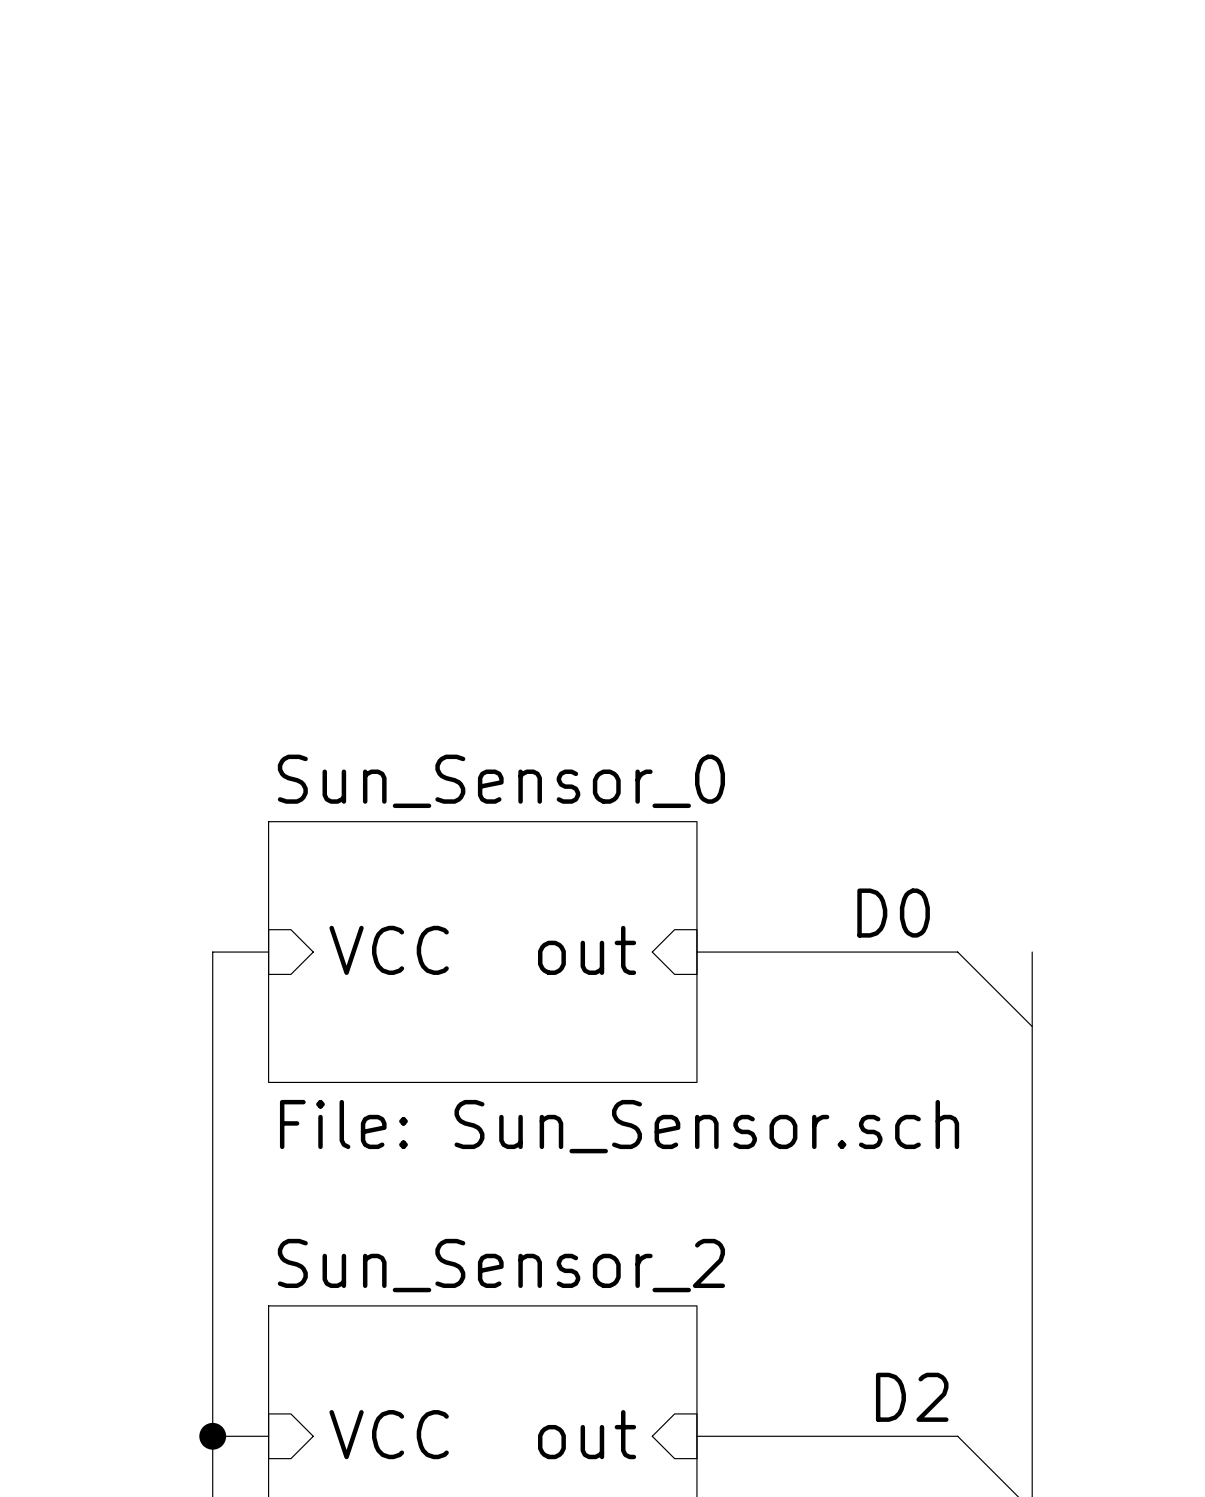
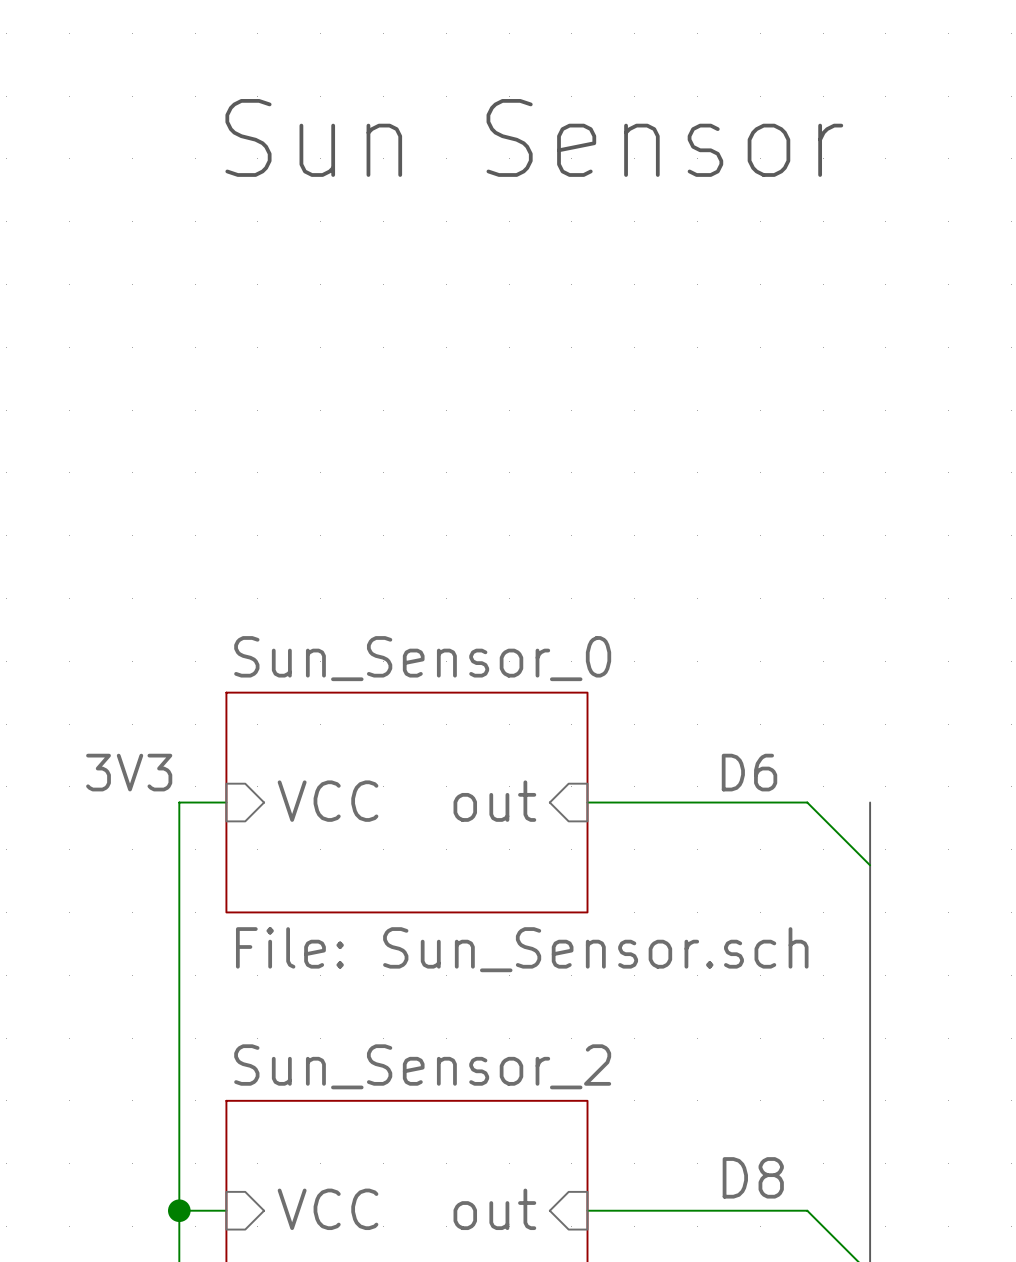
text: none -> Sun Sensor (534, 137)
label: D0 (893, 913) -> D6 (749, 772)
label: none -> 3V3 (129, 772)
label: D2 (912, 1397) -> D8 (753, 1177)

